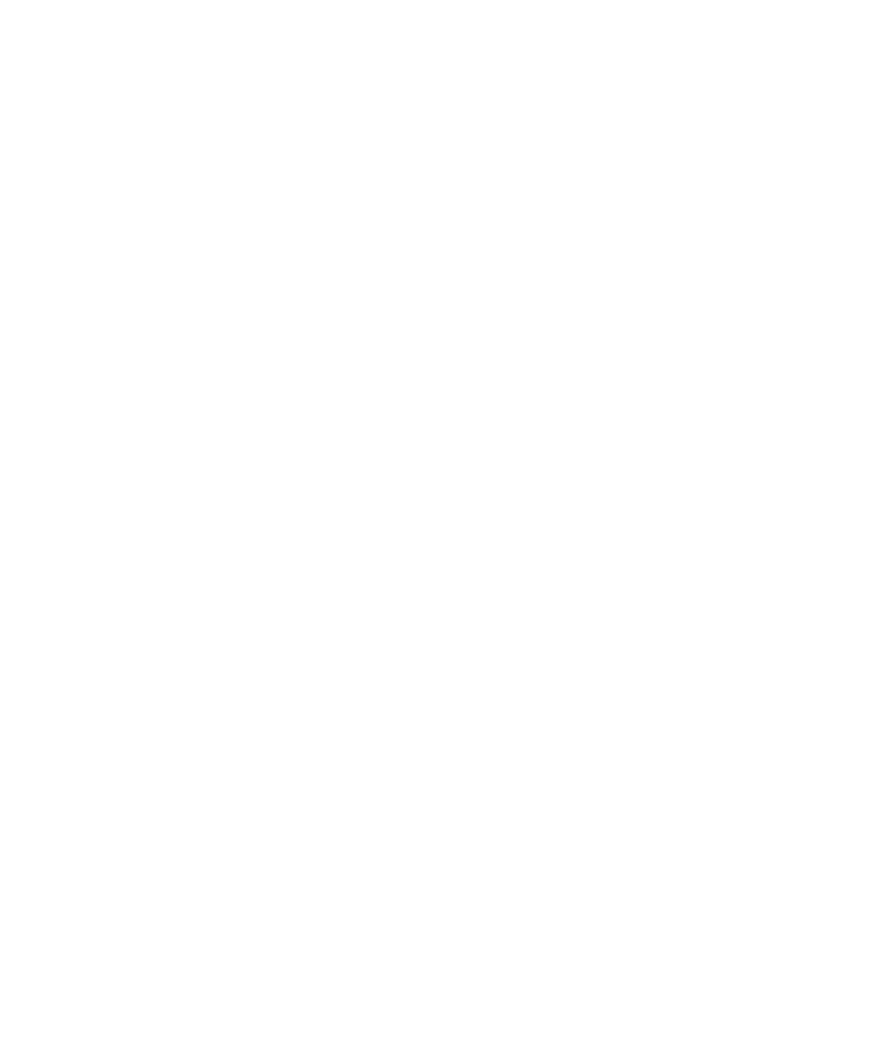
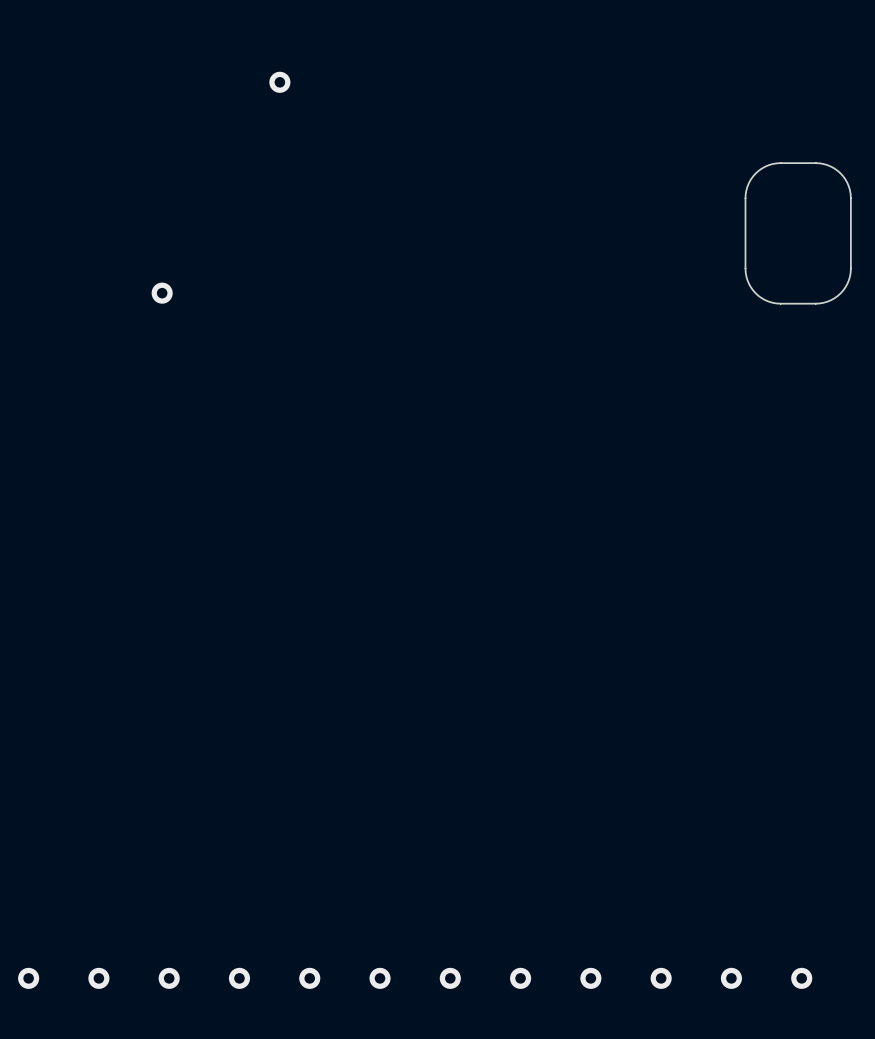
via: none -> (279, 82)
board edge: none -> (780, 163) (827, 165) (840, 173) (848, 186) (850, 198) (850, 276) (843, 290) (827, 301) (815, 303) (772, 302) (758, 296) (747, 280) (745, 268) (746, 190) (750, 179) (758, 170) (769, 165) (780, 163)
via: none -> (162, 293)
via: none -> (28, 978)
via: none -> (98, 978)
via: none -> (169, 978)
via: none -> (239, 978)
via: none -> (309, 978)
via: none -> (380, 978)
via: none -> (450, 978)
via: none -> (520, 978)
via: none -> (590, 978)
via: none -> (661, 978)
via: none -> (731, 978)
via: none -> (801, 978)

